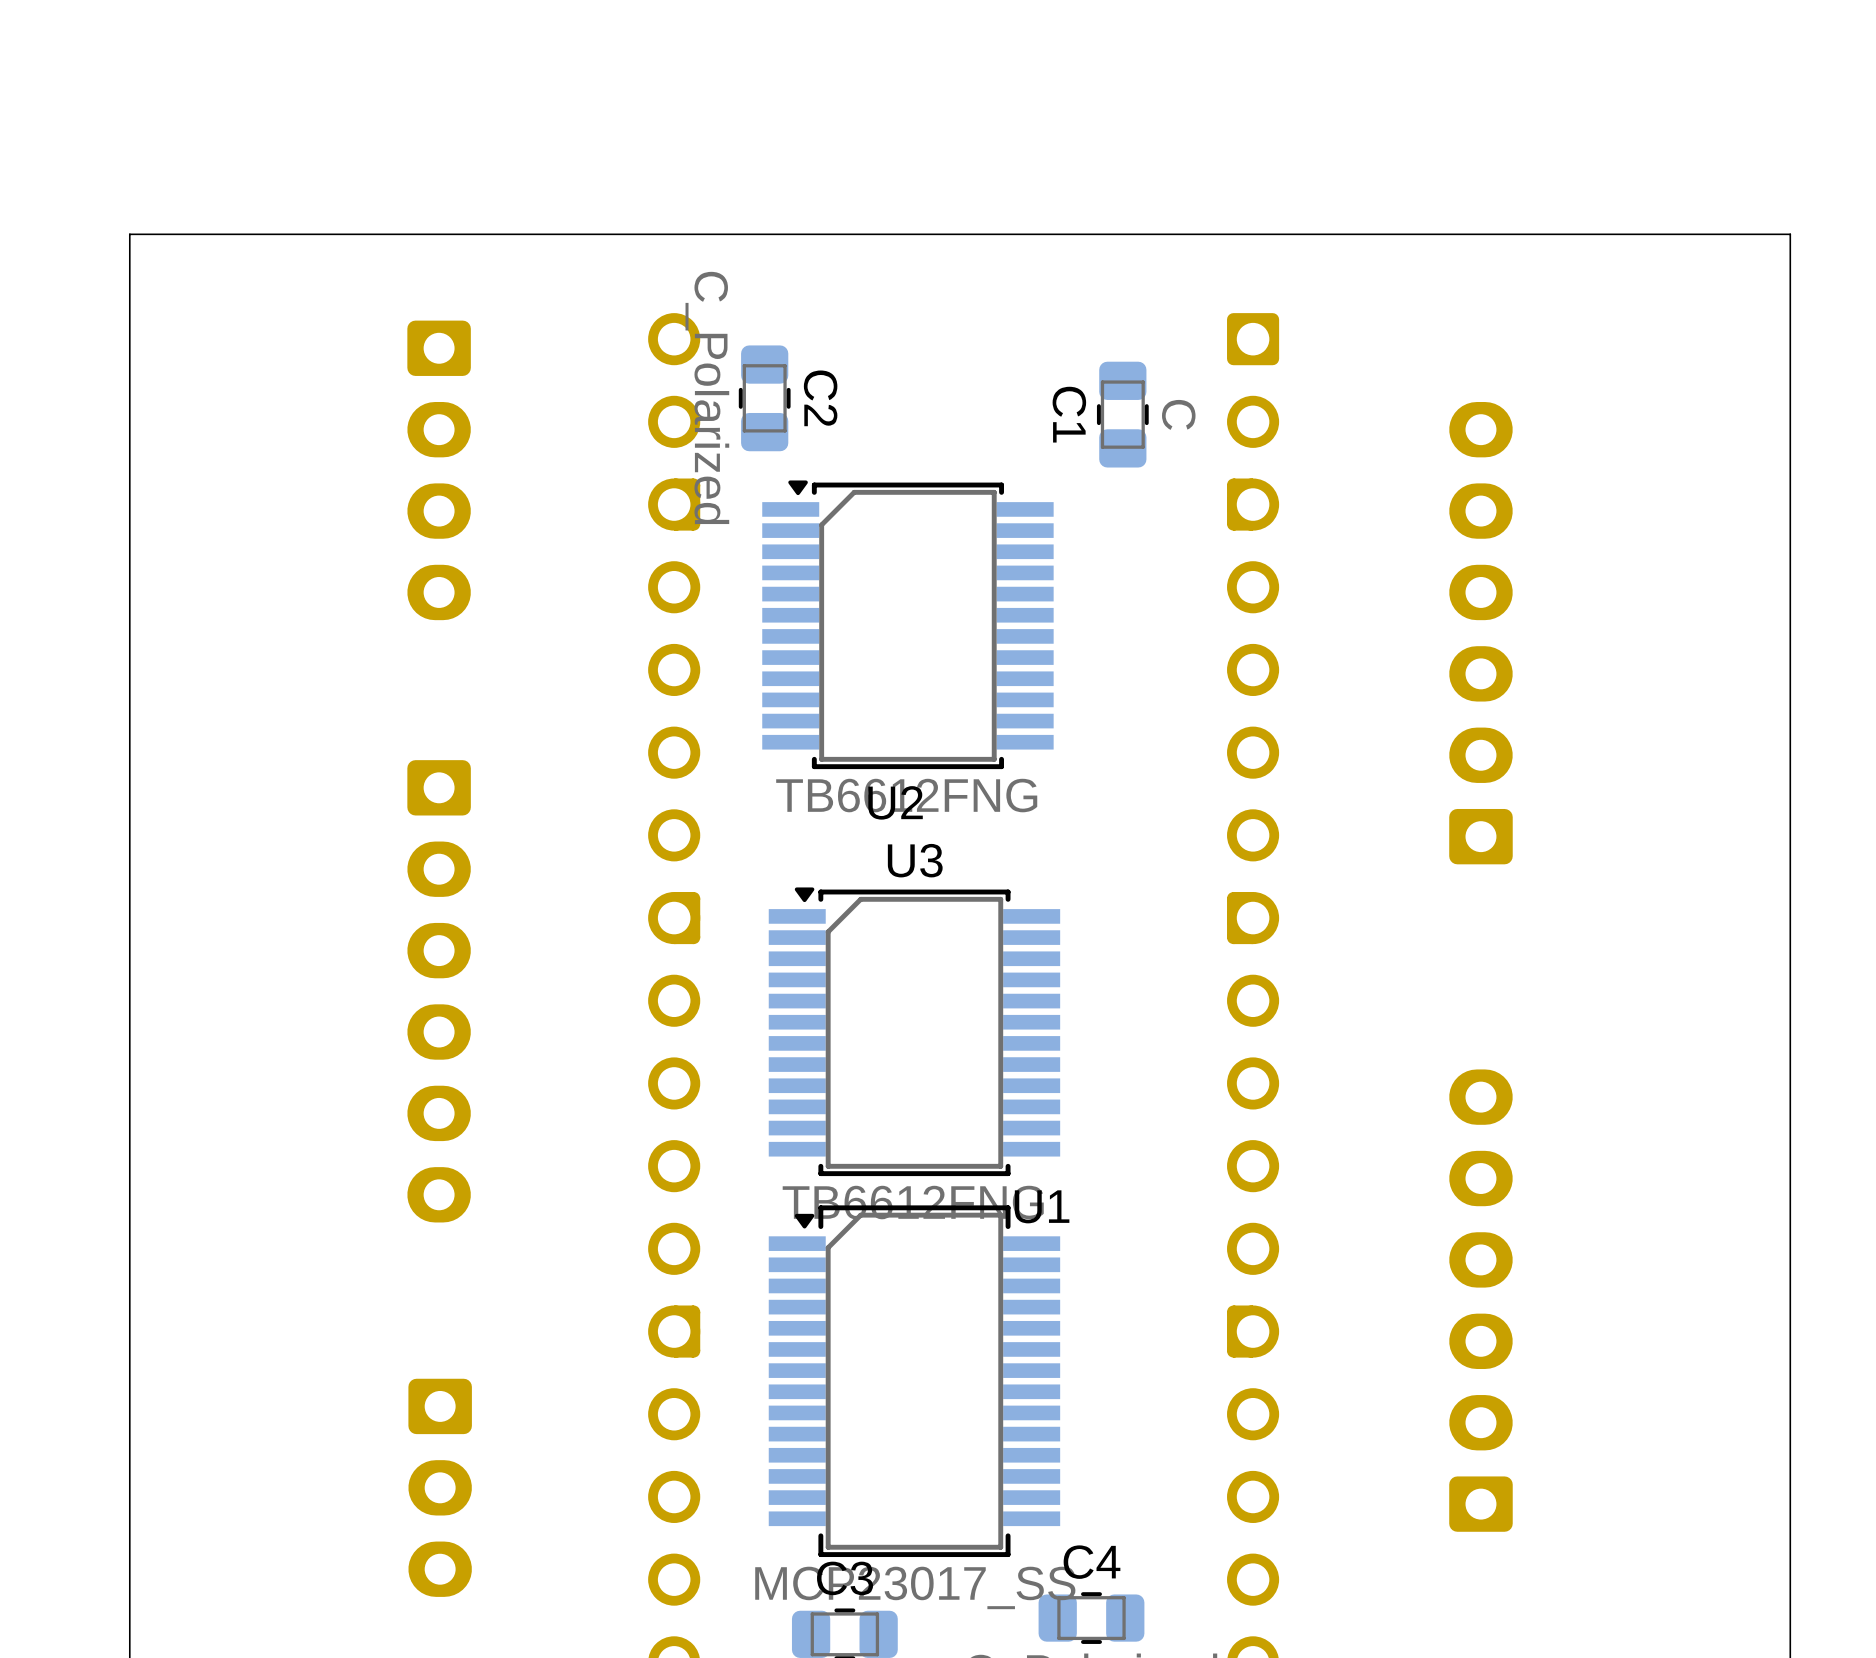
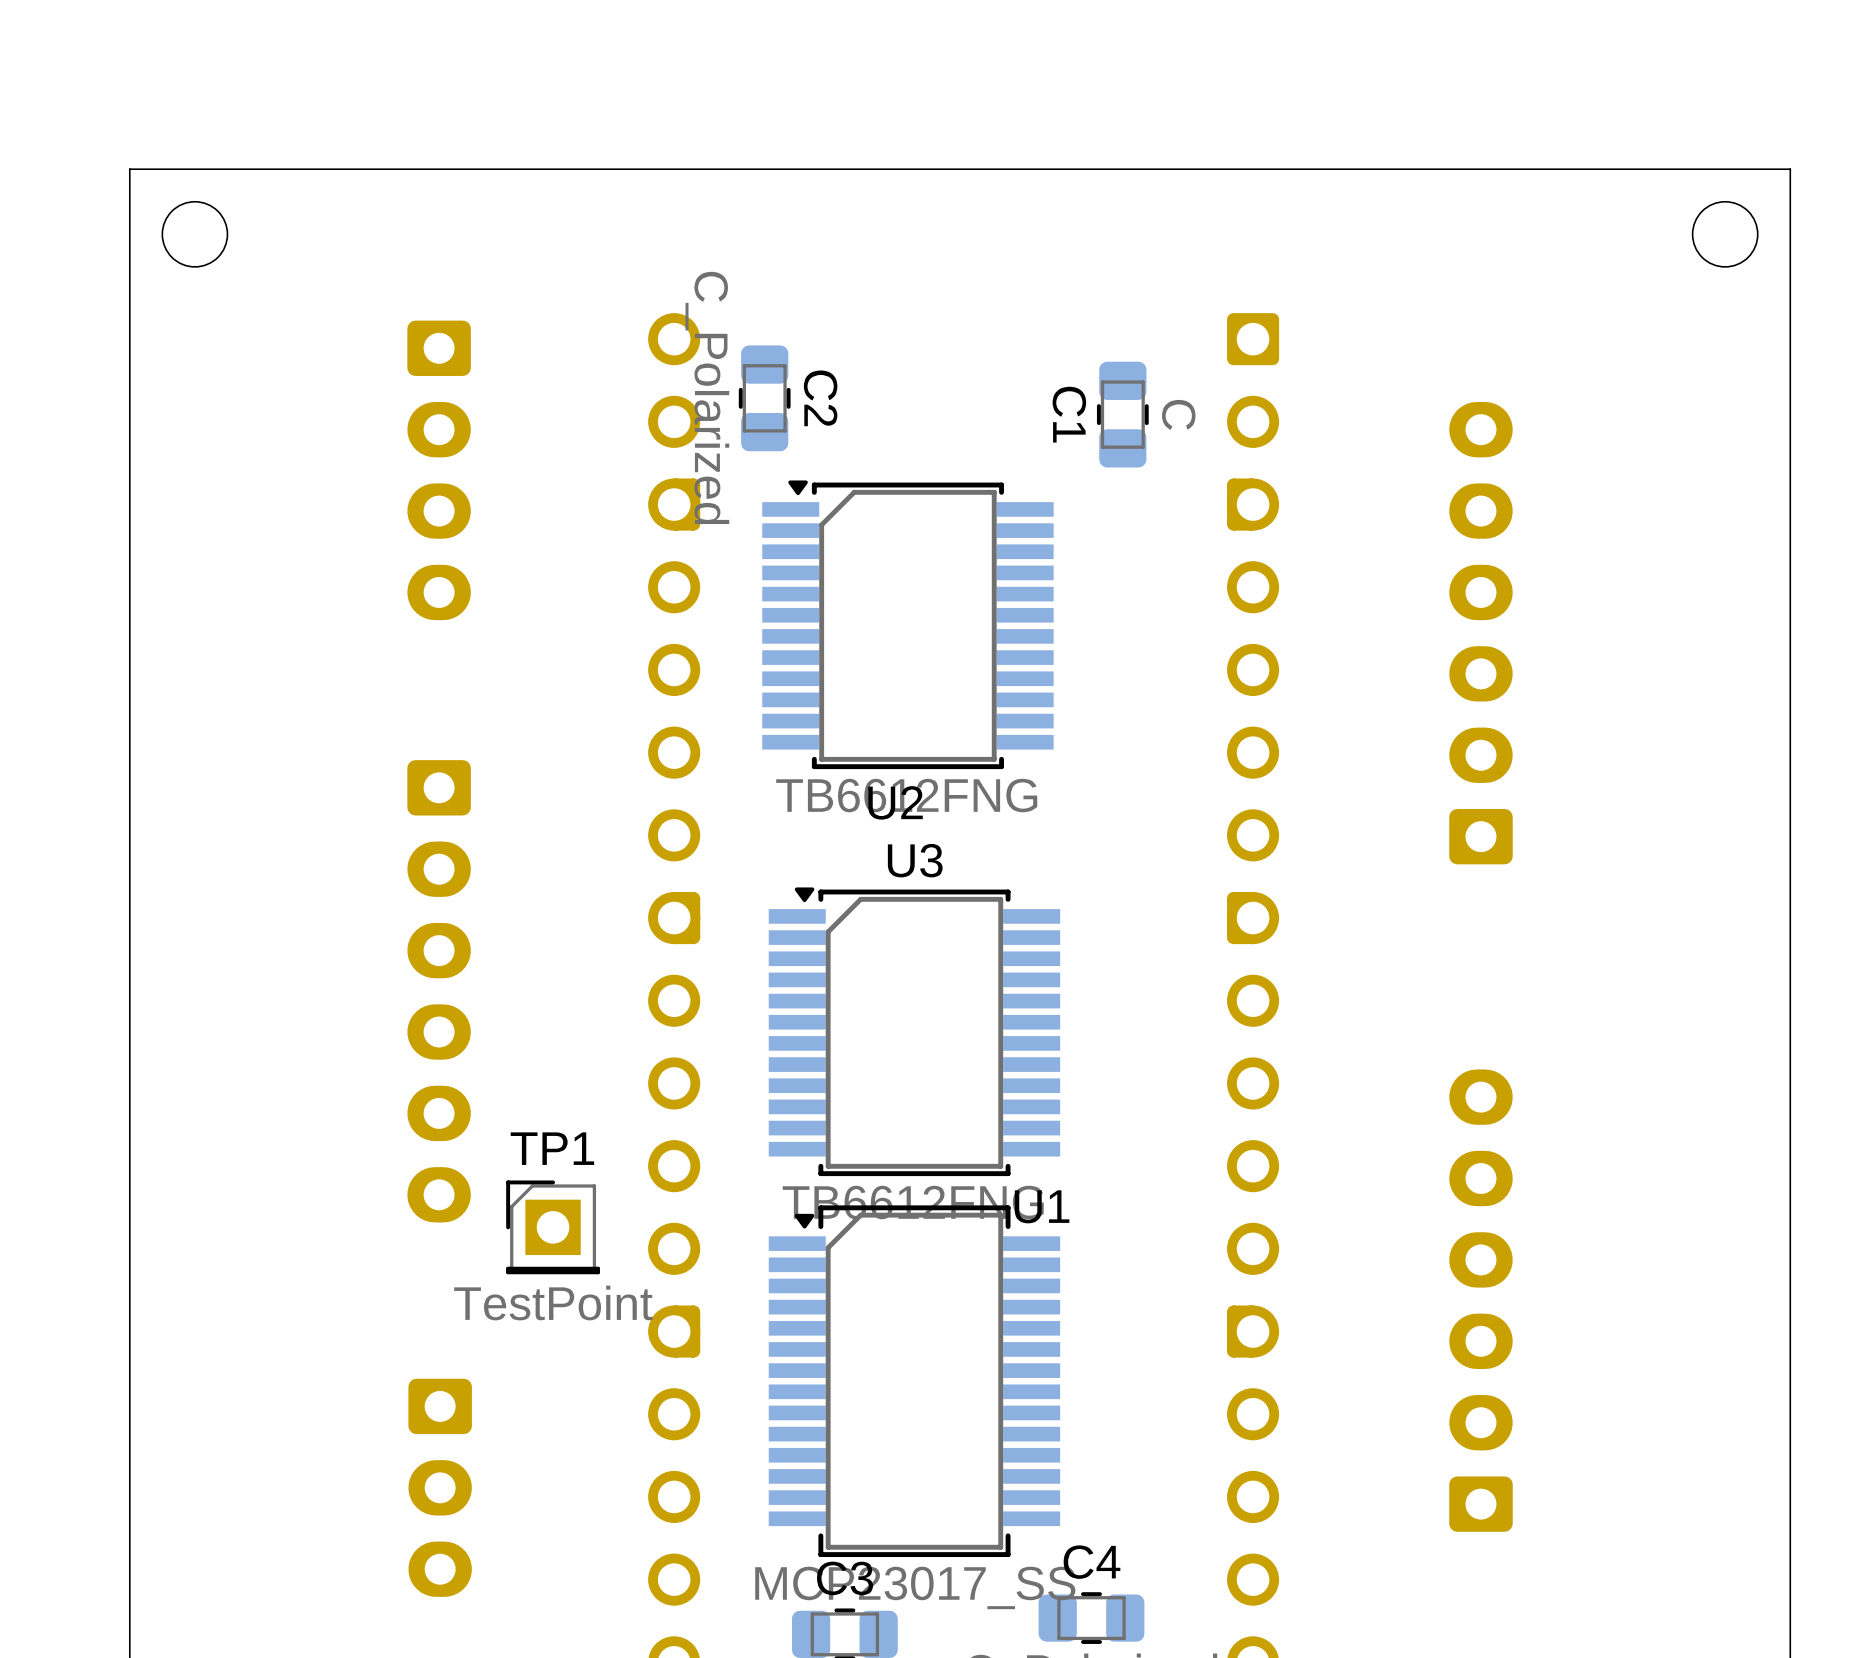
round board edge: none -> [161, 200, 229, 268]
round board edge: none -> [1691, 200, 1759, 268]
board edge: (1790, 234) (129, 234) -> (1790, 234) (1790, 169) (129, 169) (129, 234)
TP1: none -> TestPoint (553, 1227)

